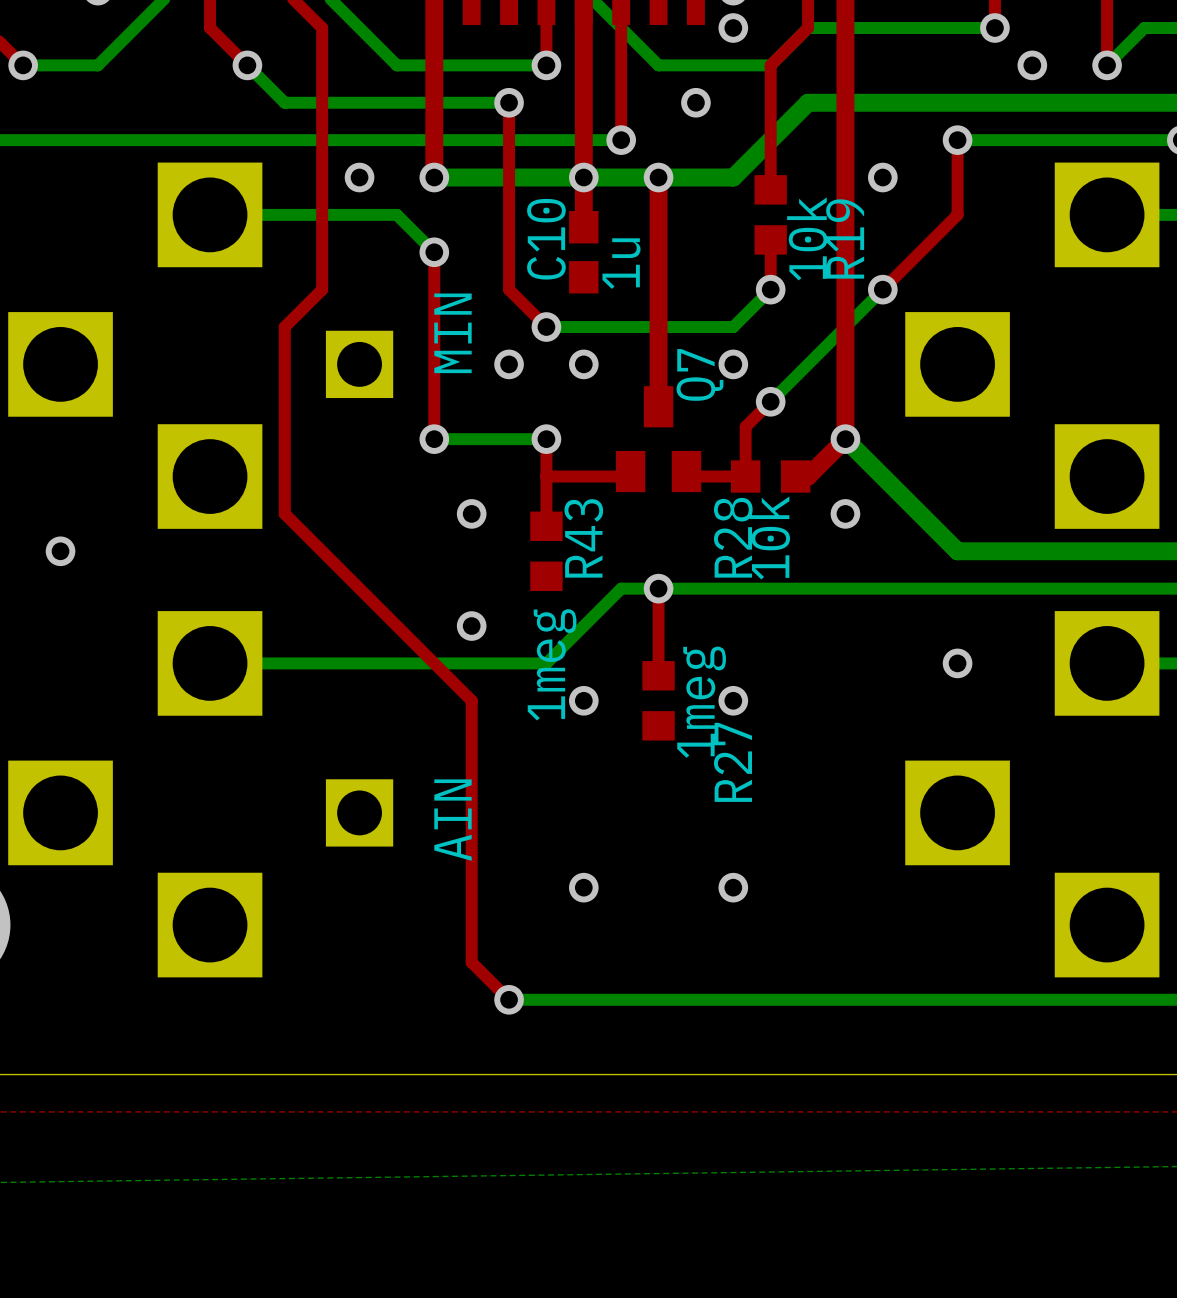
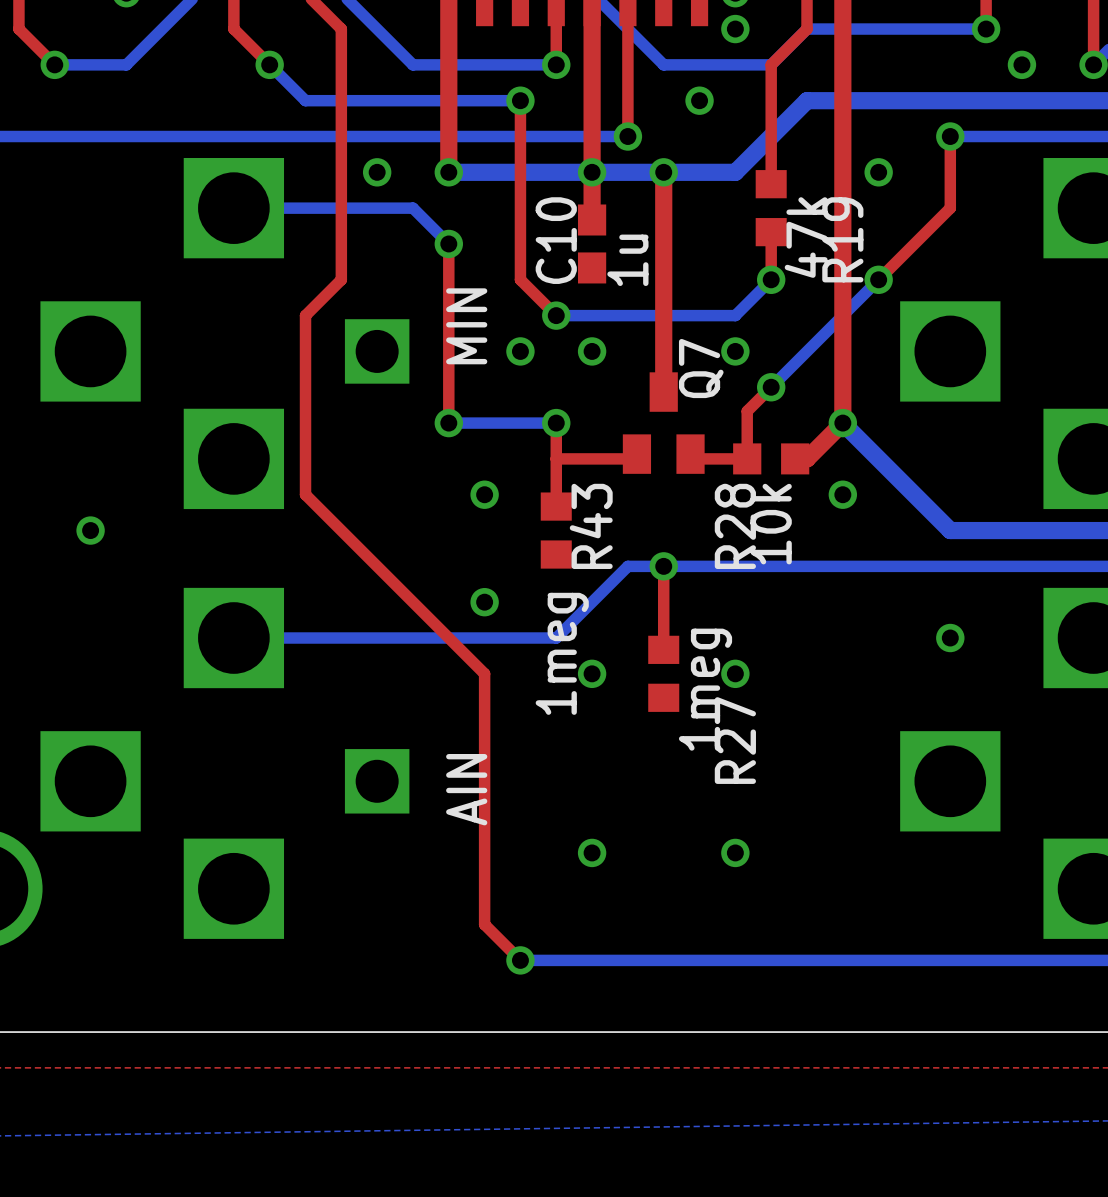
R19 value: 10k (807, 238) -> 47k (806, 237)

